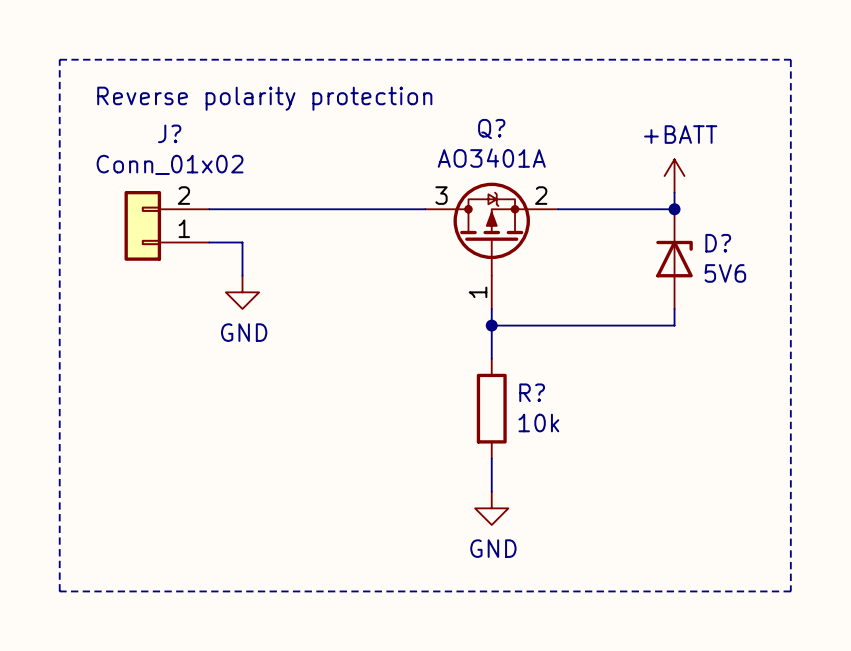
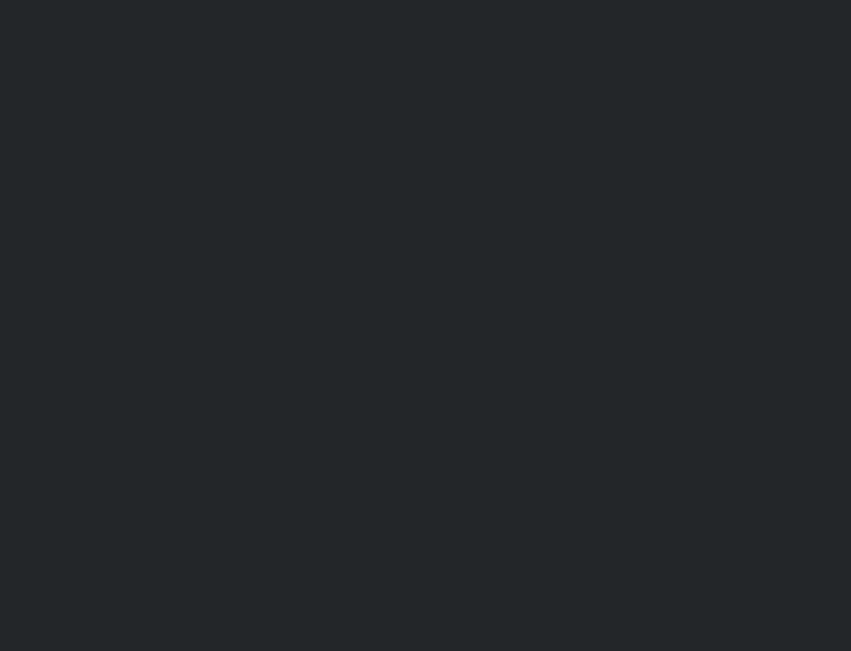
line: (59, 59) (790, 59) (790, 591) (59, 591) (59, 59) -> none
text: Reverse polarity protection (264, 98) -> none
power symbol: +BATT (674, 176) -> none
wire: (674, 192) (674, 209) (558, 209) -> none
wire: (209, 209) (425, 209) -> none
junction: (674, 209) -> none
J?: Conn_01x02 (166, 225) -> none
wire: (209, 242) (242, 242) (242, 275) -> none
Q?: AO3401A (491, 245) -> none
D?: 5V6 (674, 259) -> none
power symbol: GND (242, 292) -> none
wire: (491, 308) (491, 358) -> none
wire: (674, 308) (674, 325) (491, 325) -> none
junction: (491, 325) -> none
R?: 10k (491, 408) -> none
wire: (491, 458) (491, 491) -> none
power symbol: GND (491, 508) -> none

